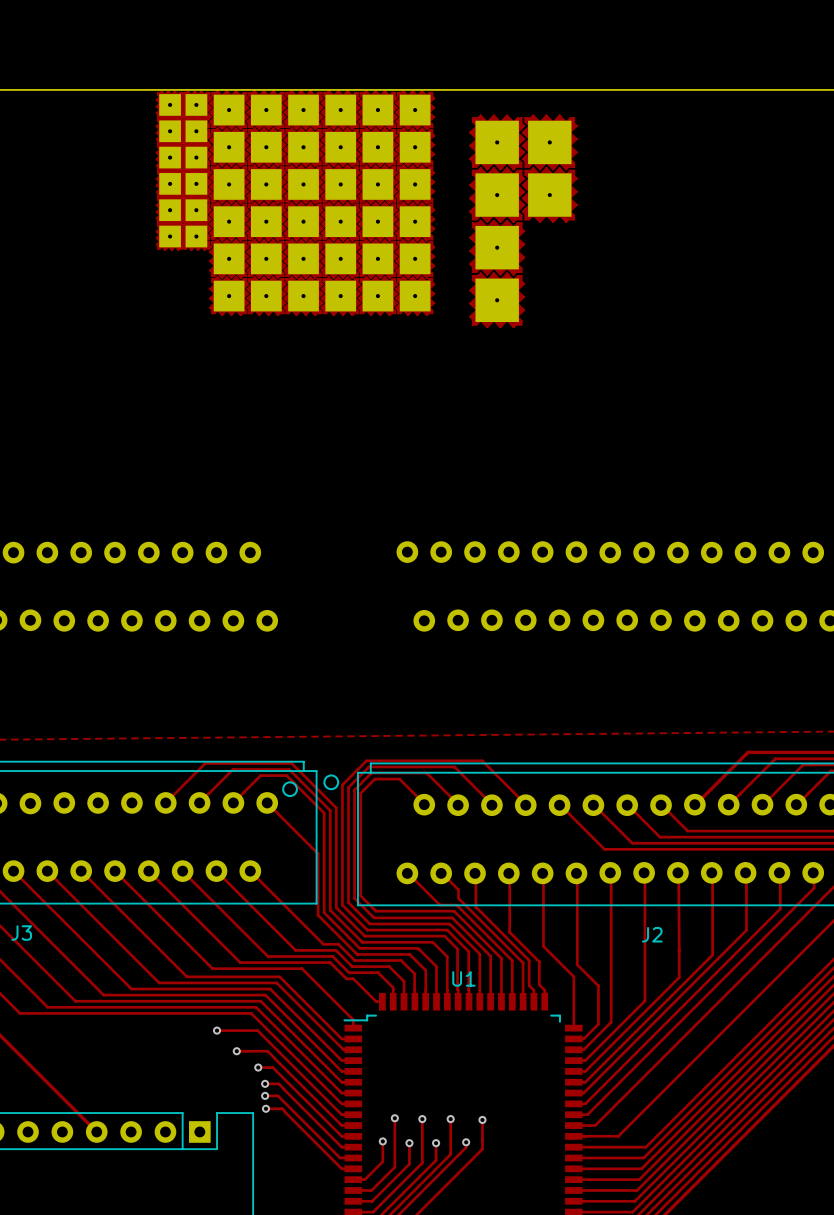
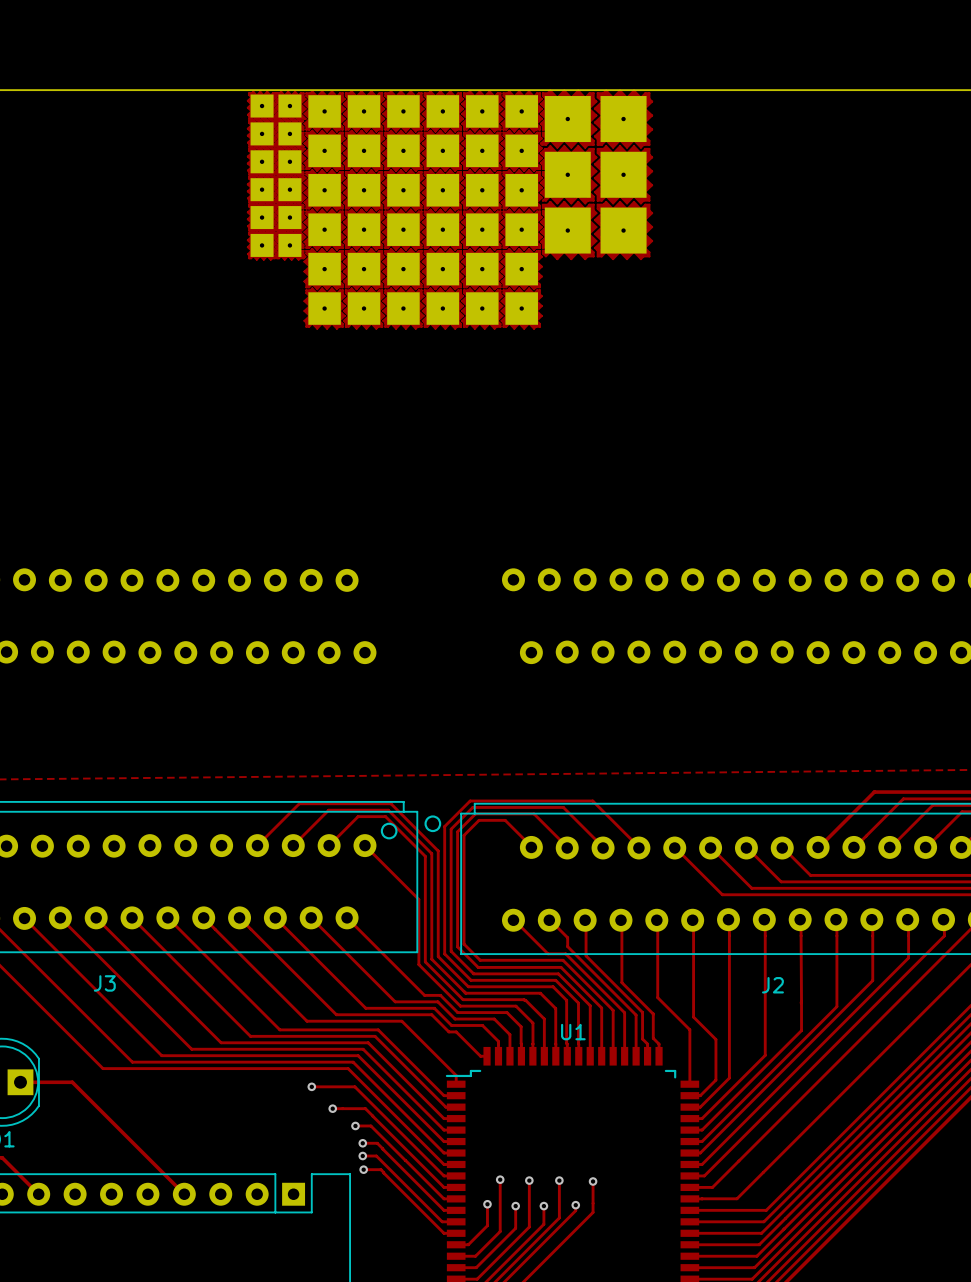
part: none -> (568, 119)
part: none -> (623, 119)
part: (497, 142) -> none
part: (549, 142) -> none
part: none -> (568, 174)
part: none -> (623, 174)
part: (497, 195) -> none
part: (549, 195) -> none
part: none -> (568, 230)
part: none -> (623, 230)
part: (497, 247) -> none
part: (497, 300) -> none

